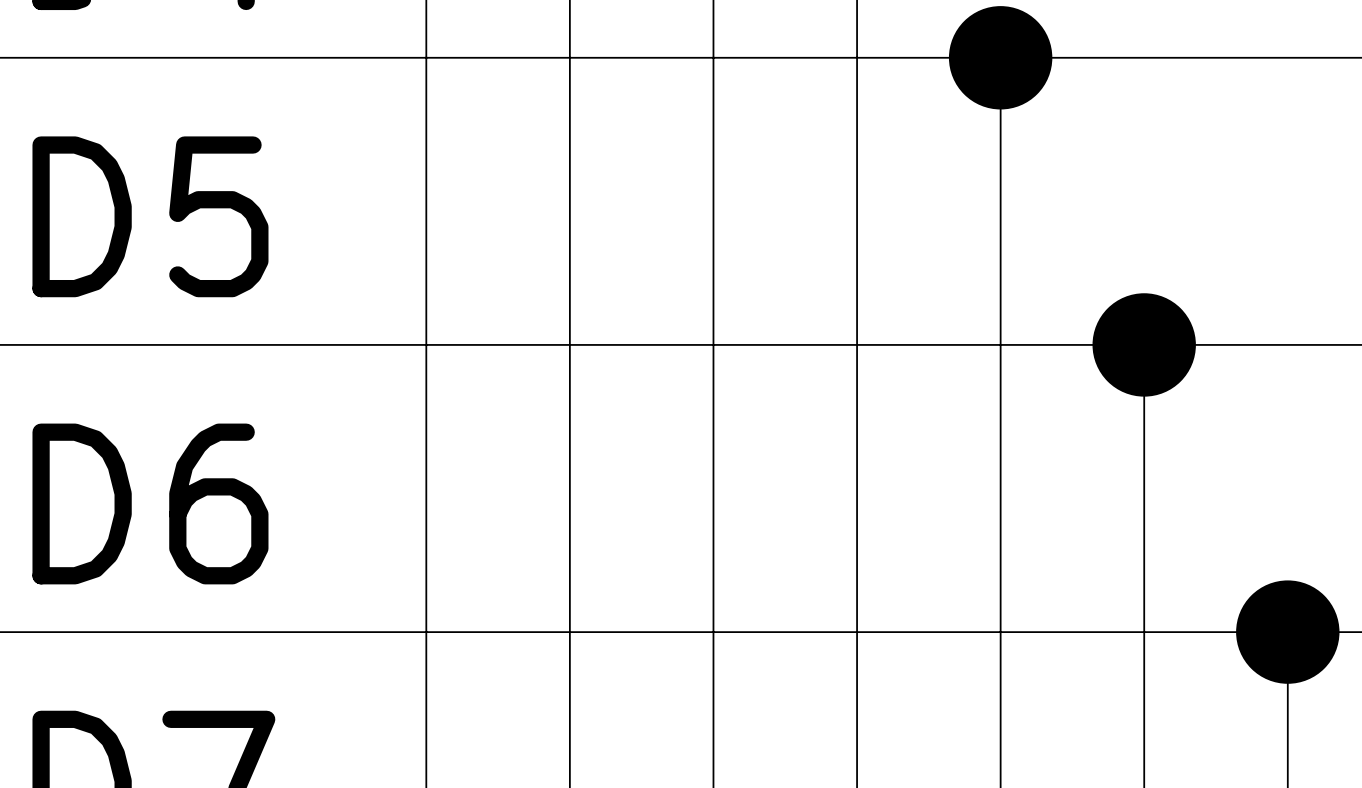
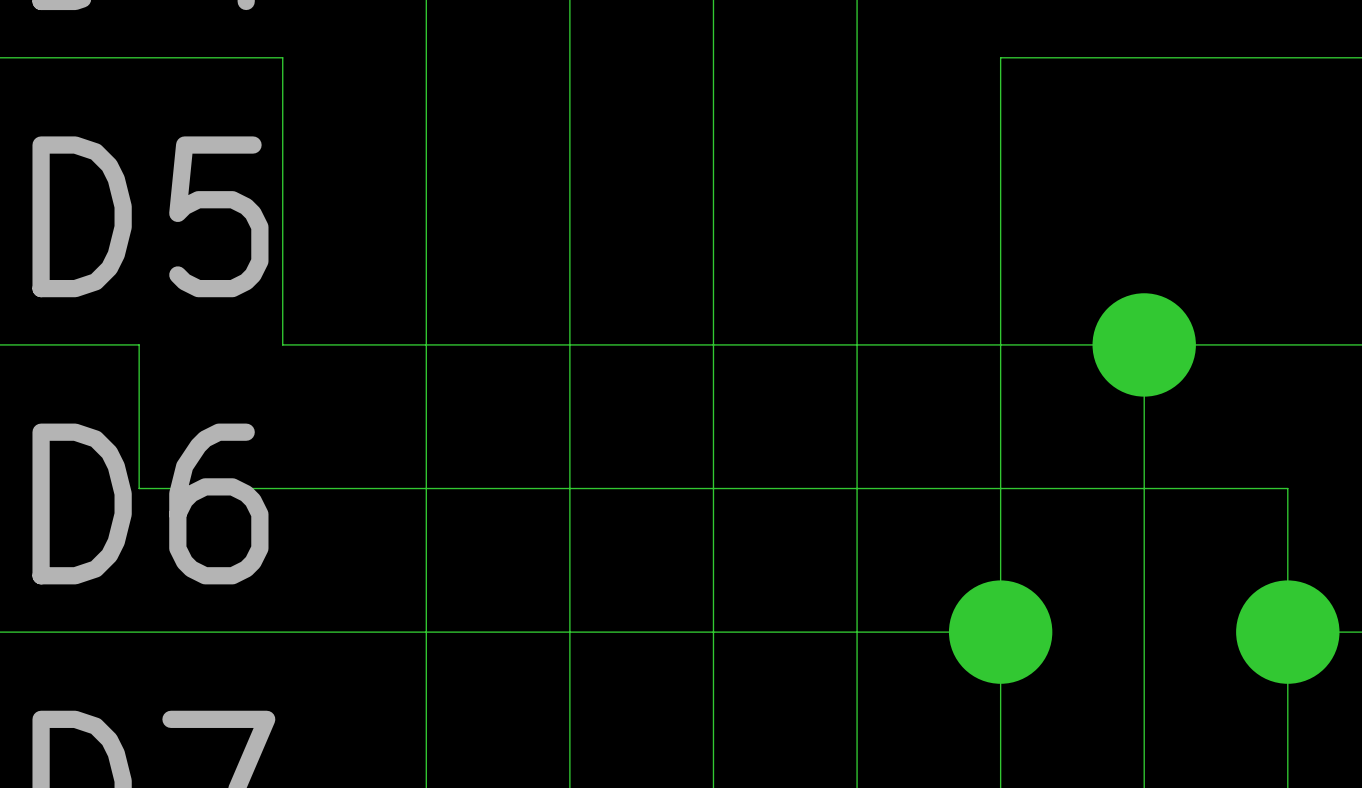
wire: (282, 57) (1000, 57) -> none
junction position: (1000, 57) -> (1000, 632)
wire: (139, 344) (282, 344) -> (282, 57) (282, 344)
wire: (1000, 632) (1287, 632) -> (139, 344) (139, 488) (1287, 488) (1287, 632)

